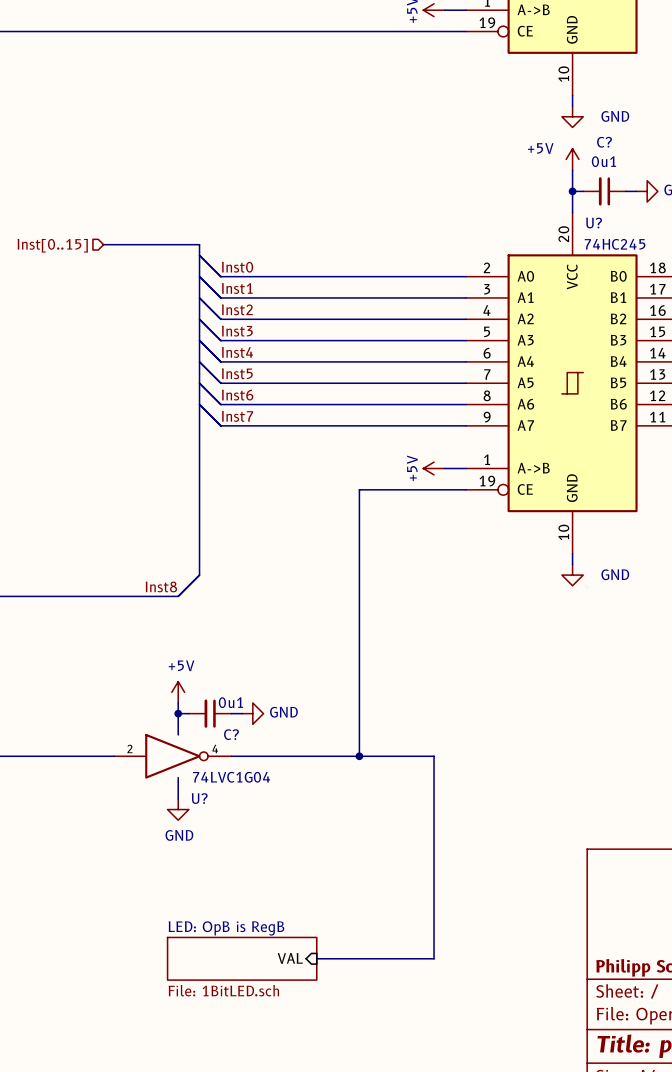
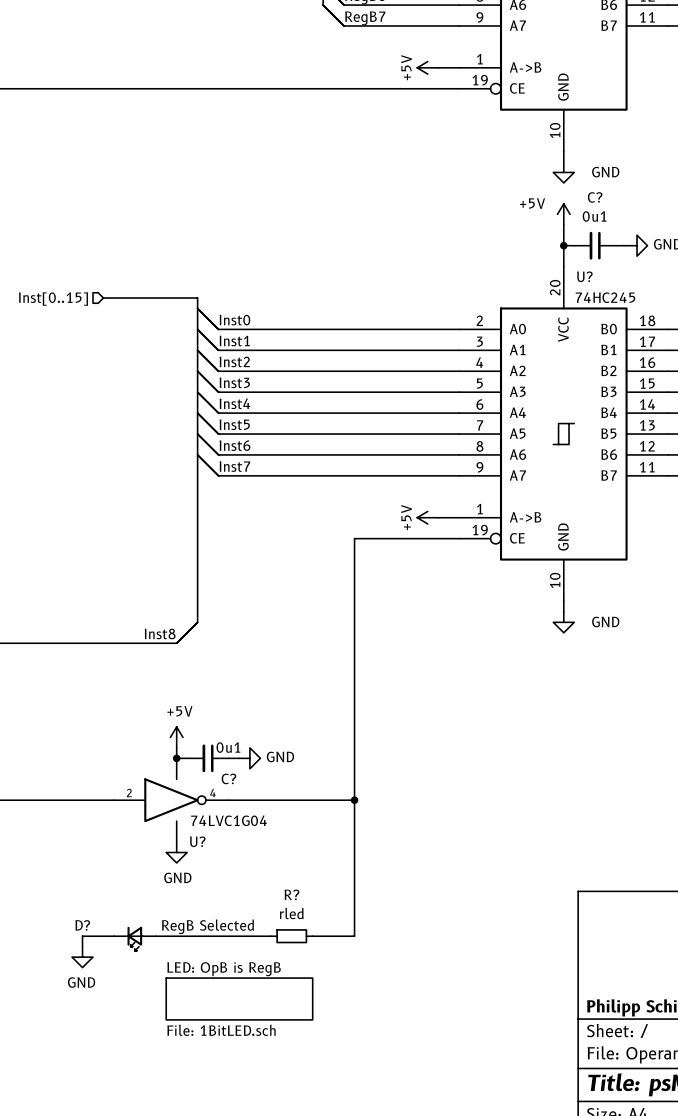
wire: (359, 756) (434, 756) (434, 958) (316, 958) -> (354, 800) (354, 936) (312, 936)
wire: none -> (113, 936) (82, 936) (82, 946)
wire: none -> (155, 936) (270, 936)
R?: none -> rled (291, 936)
D?: none -> RegB Selected (134, 938)
power symbol: none -> GND (82, 957)
sheet pin: VAL (290, 958) -> none

